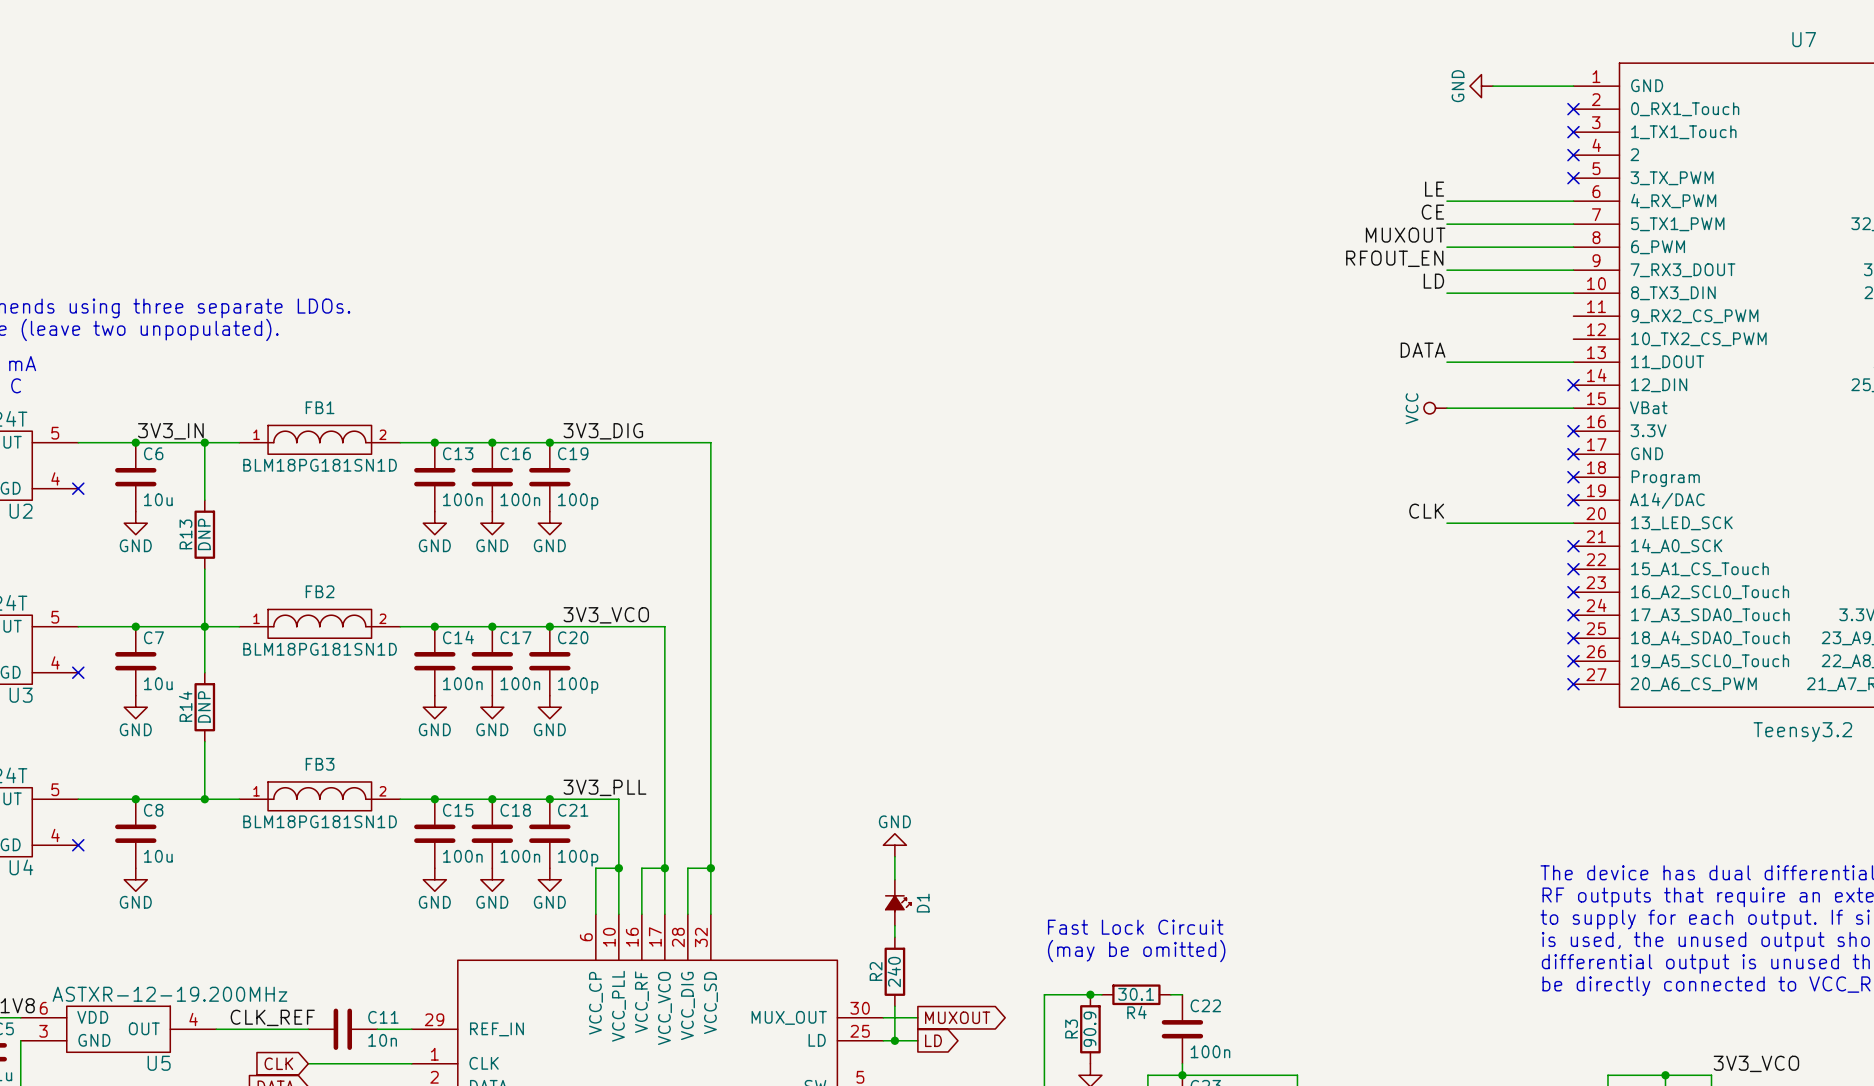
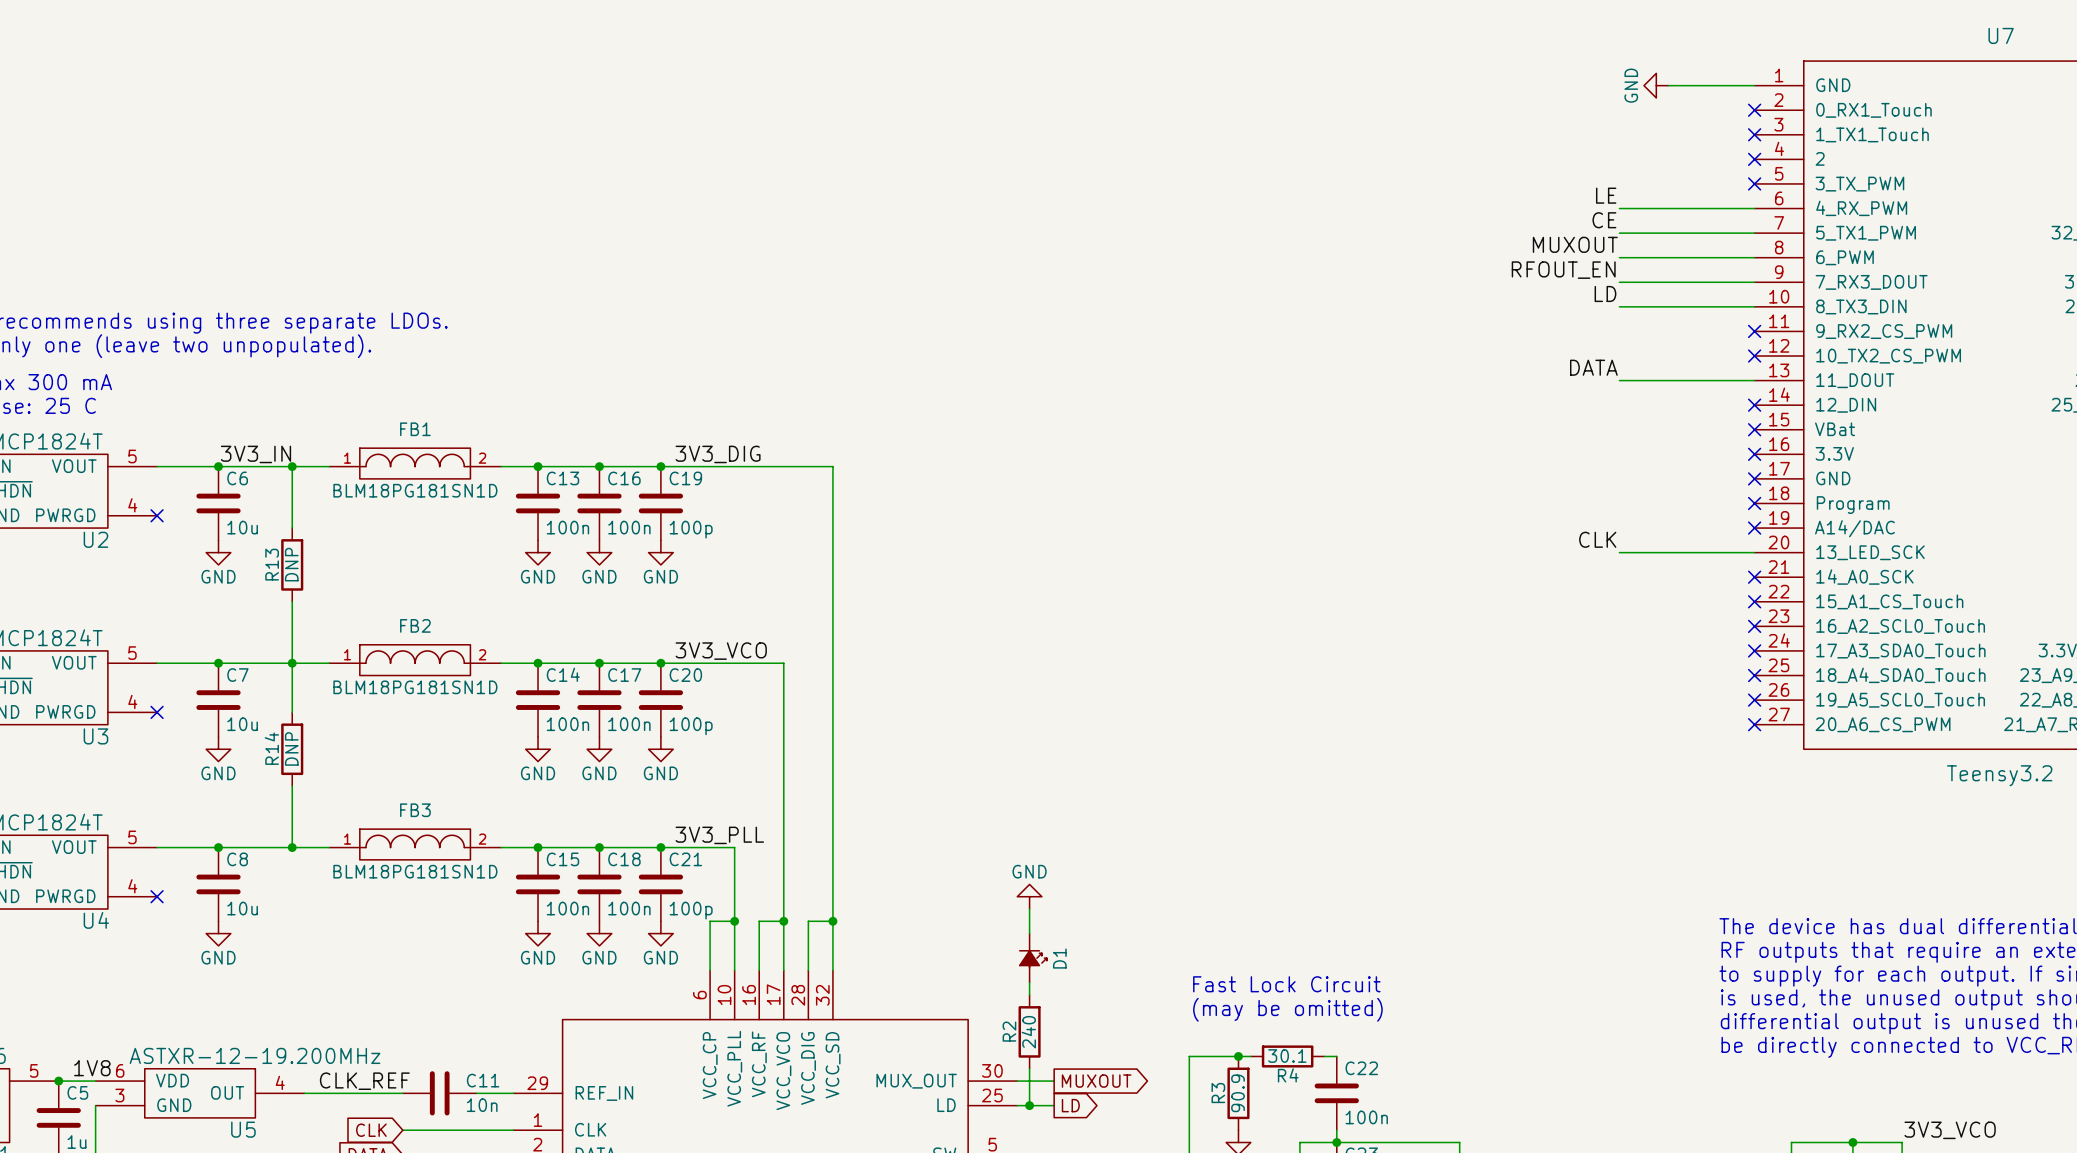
no-connect mark: none -> (1754, 331)
no-connect mark: none -> (1754, 356)
power symbol: VCC (1435, 408) -> none
wire: (1446, 408) (1573, 408) -> none
no-connect mark: none -> (1754, 429)

